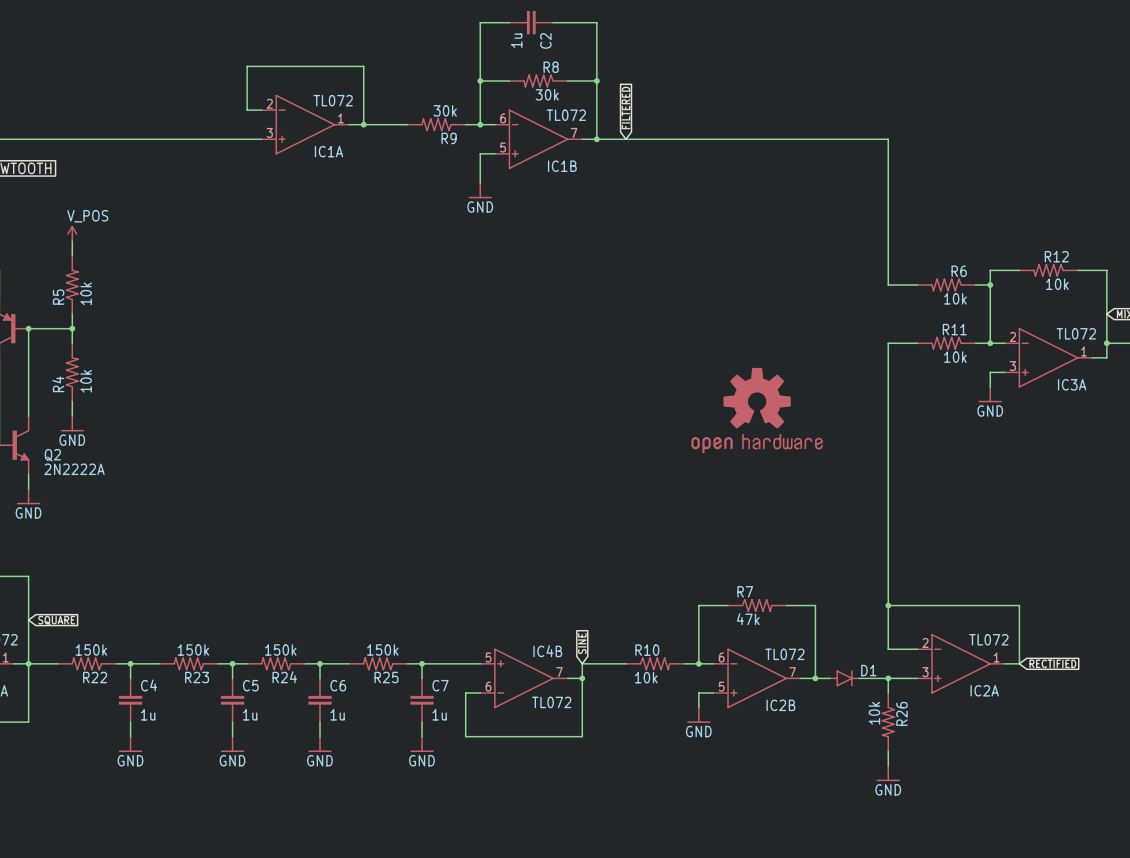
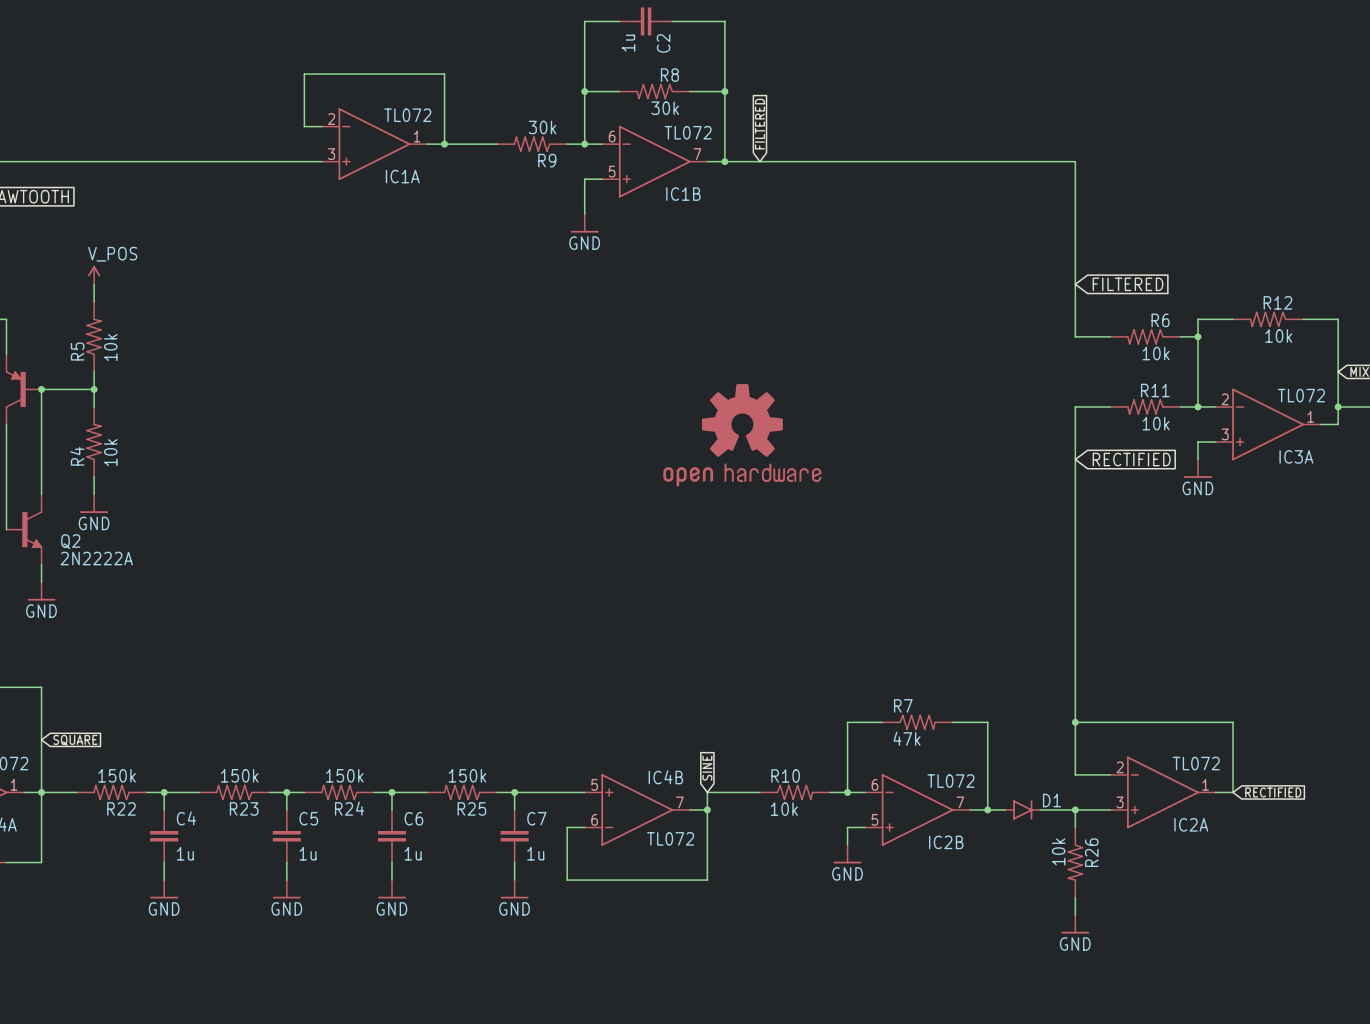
global label: none -> FILTERED (1128, 284)
part: none -> (742, 435)
global label: none -> RECTIFIED (1131, 459)
part: (757, 410) -> none

